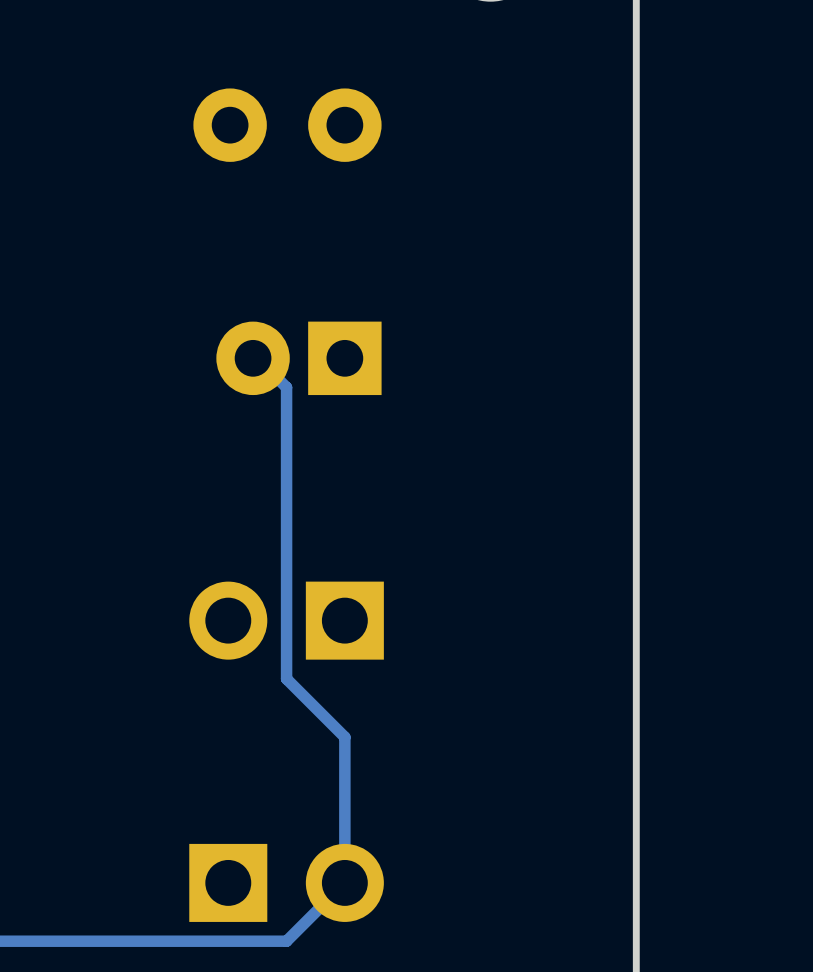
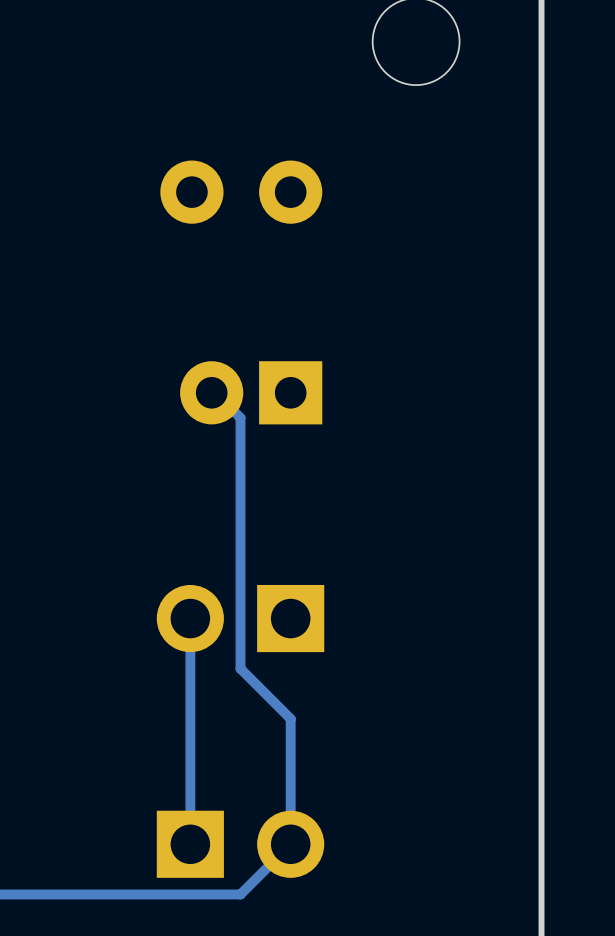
track: none -> (190, 618) (190, 844)

